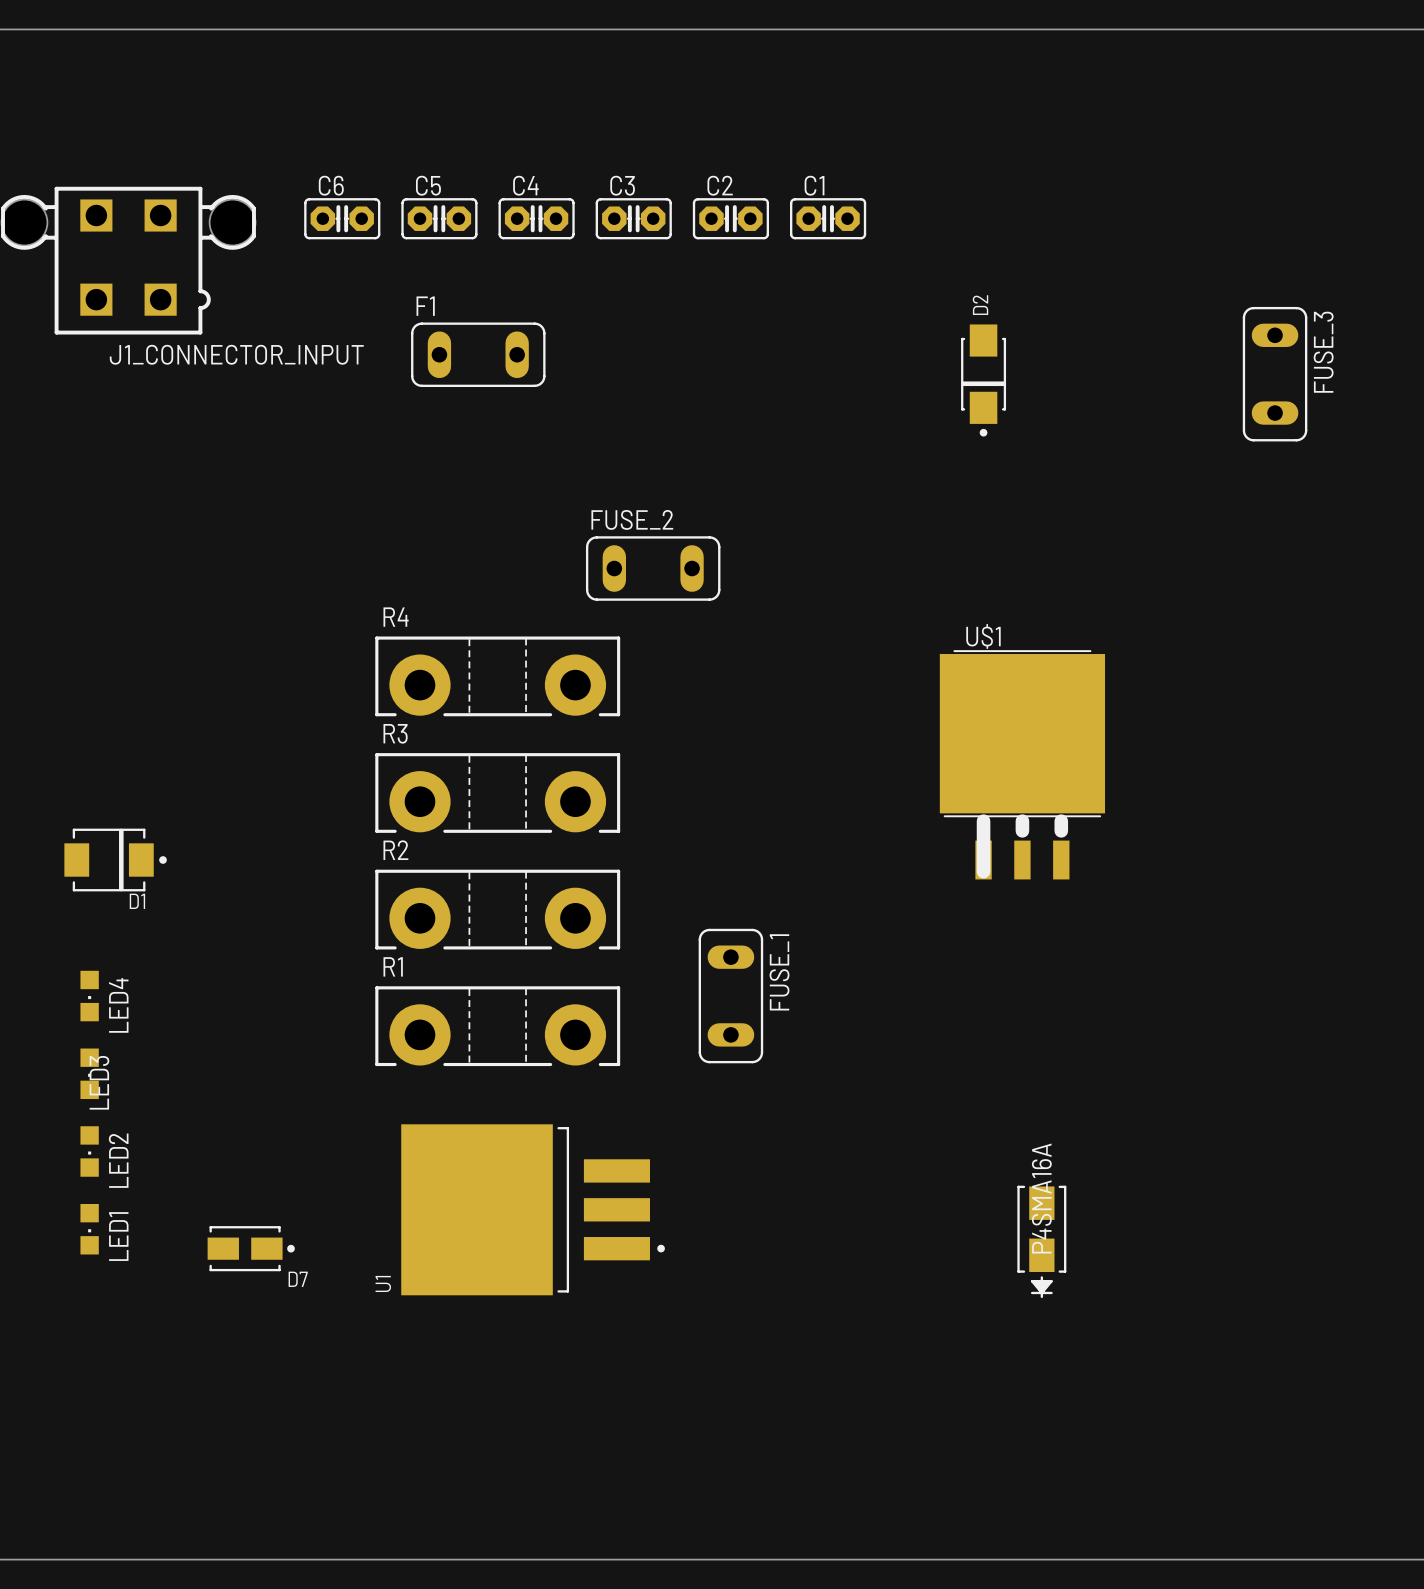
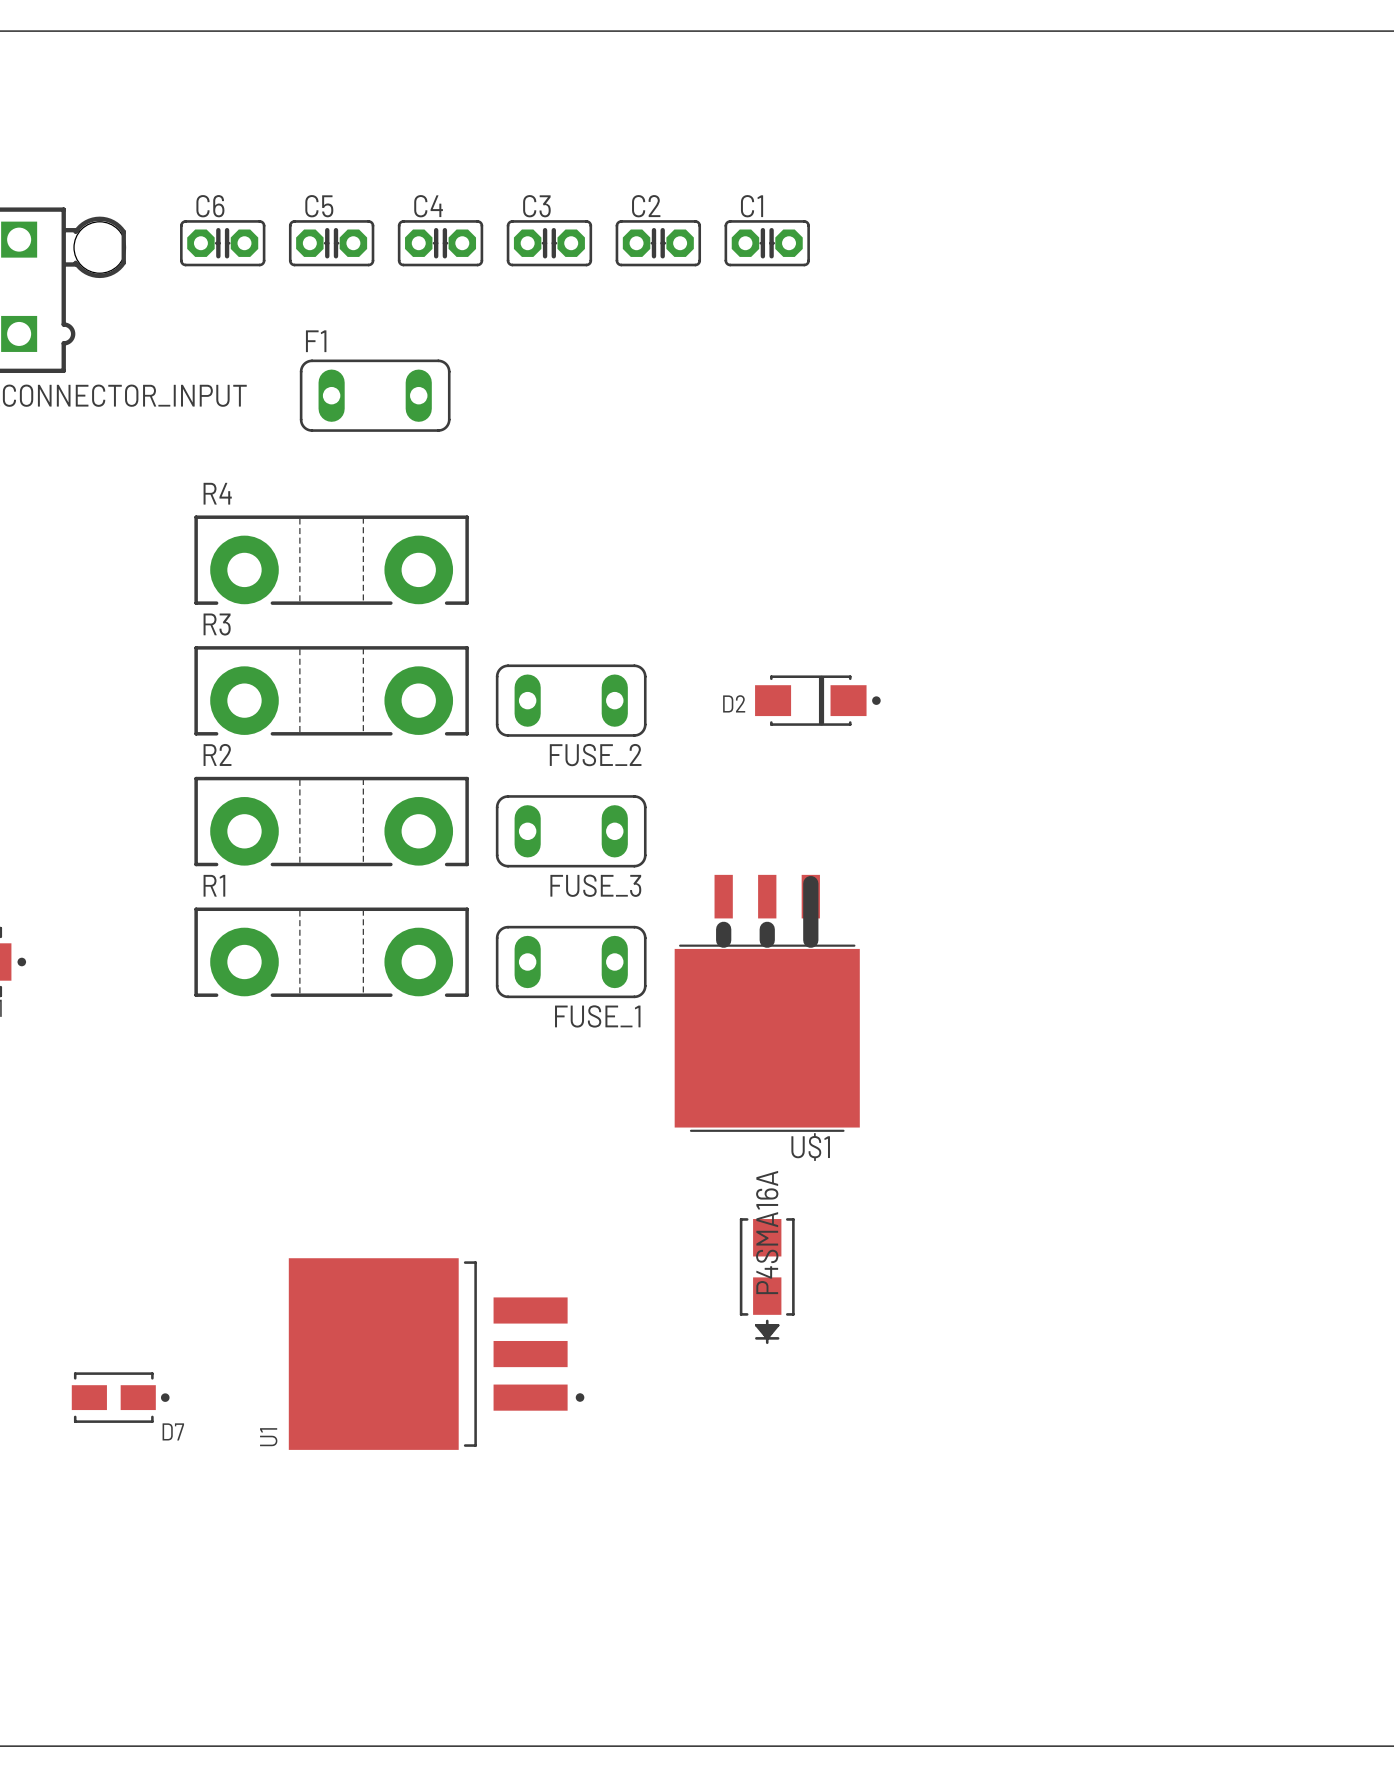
FUSE_3 rotation: 0° (1275, 374) -> 90° clockwise (571, 831)
FUSE_3 position: (1275, 374) -> (571, 831)
D2 rotation: 0° (983, 380) -> 90° counterclockwise (817, 700)
D2 position: (983, 380) -> (817, 700)
FUSE_2 name position: FUSE_2 (632, 519) -> FUSE_2 (595, 755)
FUSE_2 position: (653, 568) -> (571, 700)
R4 position: (497, 676) -> (331, 560)
U$1 rotation: 0° (1022, 764) -> 180° (767, 1003)
U$1 position: (1022, 764) -> (767, 1003)
R3 position: (497, 792) -> (331, 690)
R2 position: (497, 909) -> (331, 821)
FUSE_1 rotation: 0° (730, 996) -> 90° clockwise (571, 962)
FUSE_1 position: (730, 996) -> (571, 962)
R1 position: (497, 1026) -> (331, 952)
part position: (1041, 1241) -> (767, 1281)

